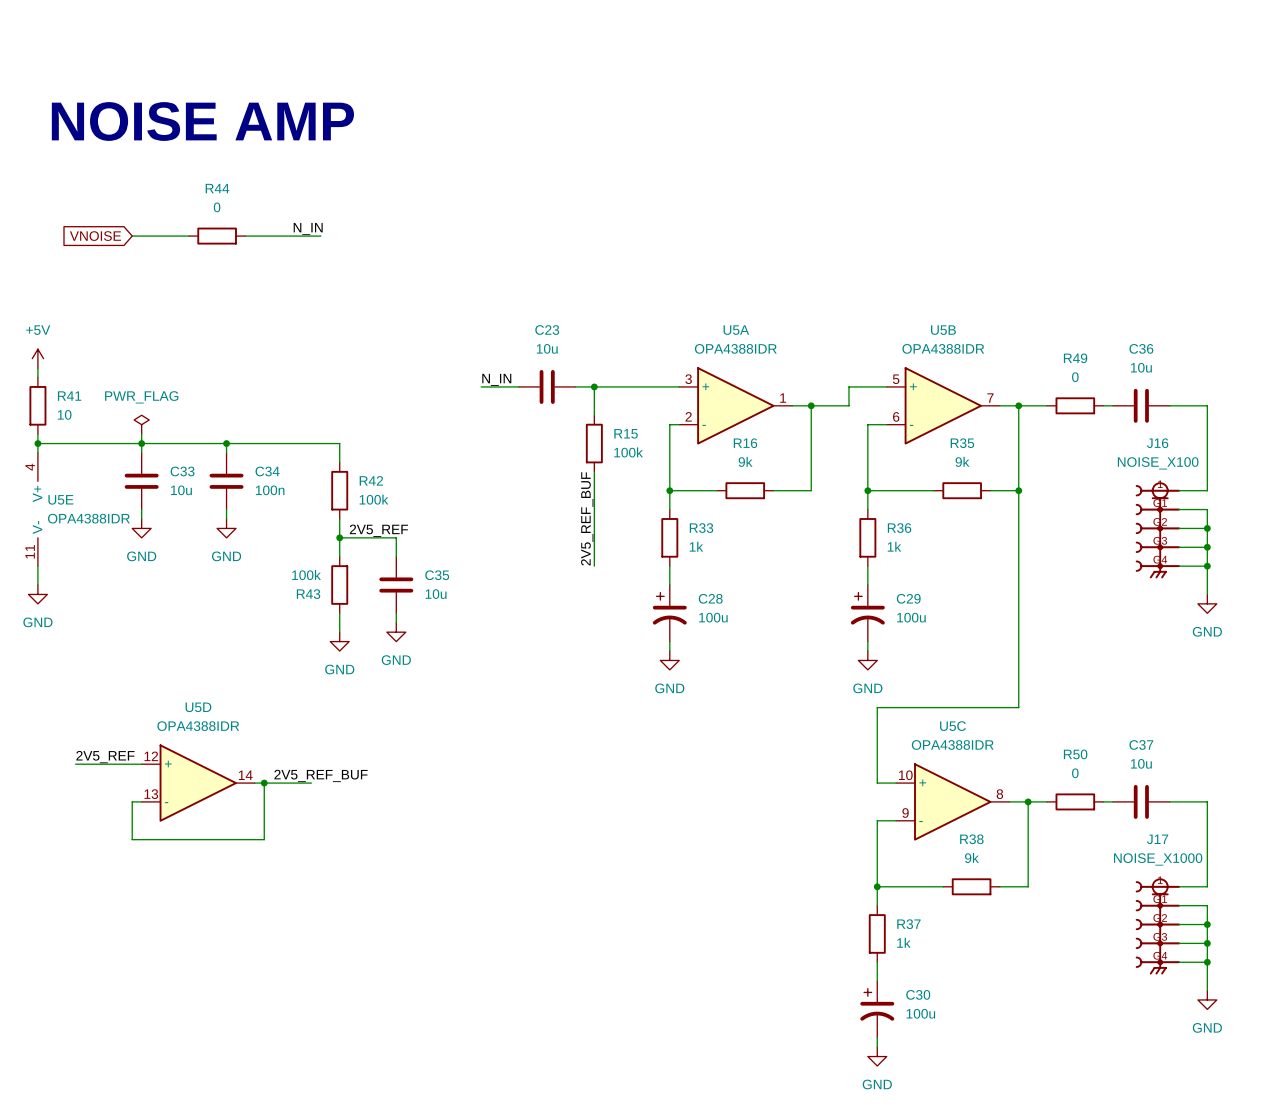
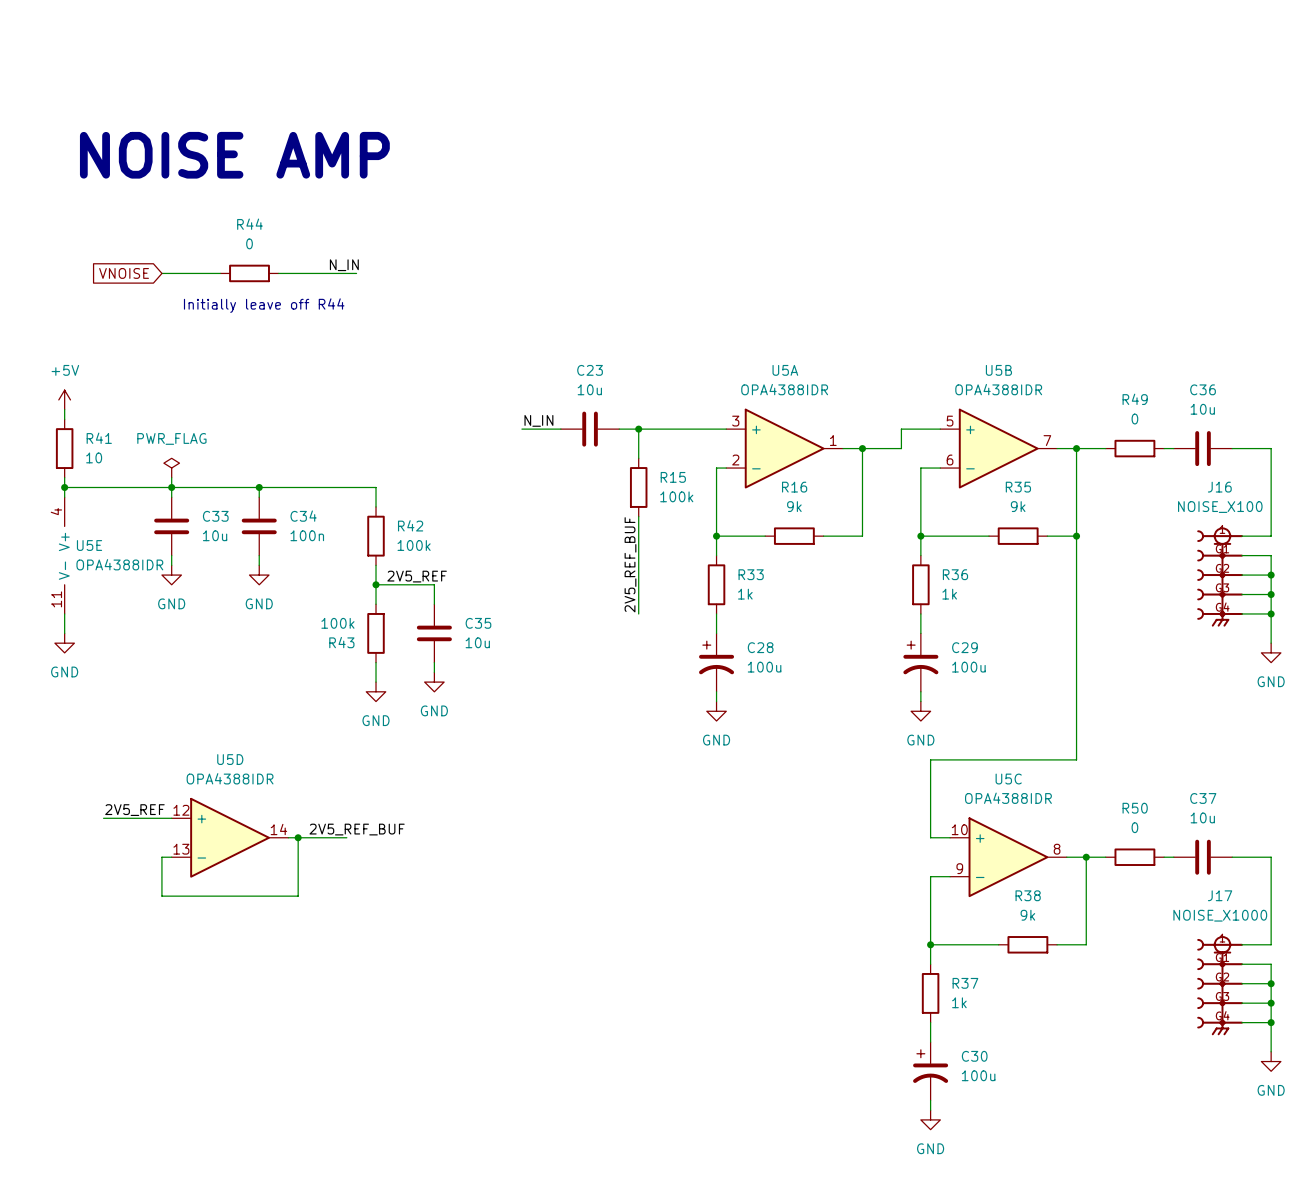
text: none -> Initially leave off R44 (264, 305)

